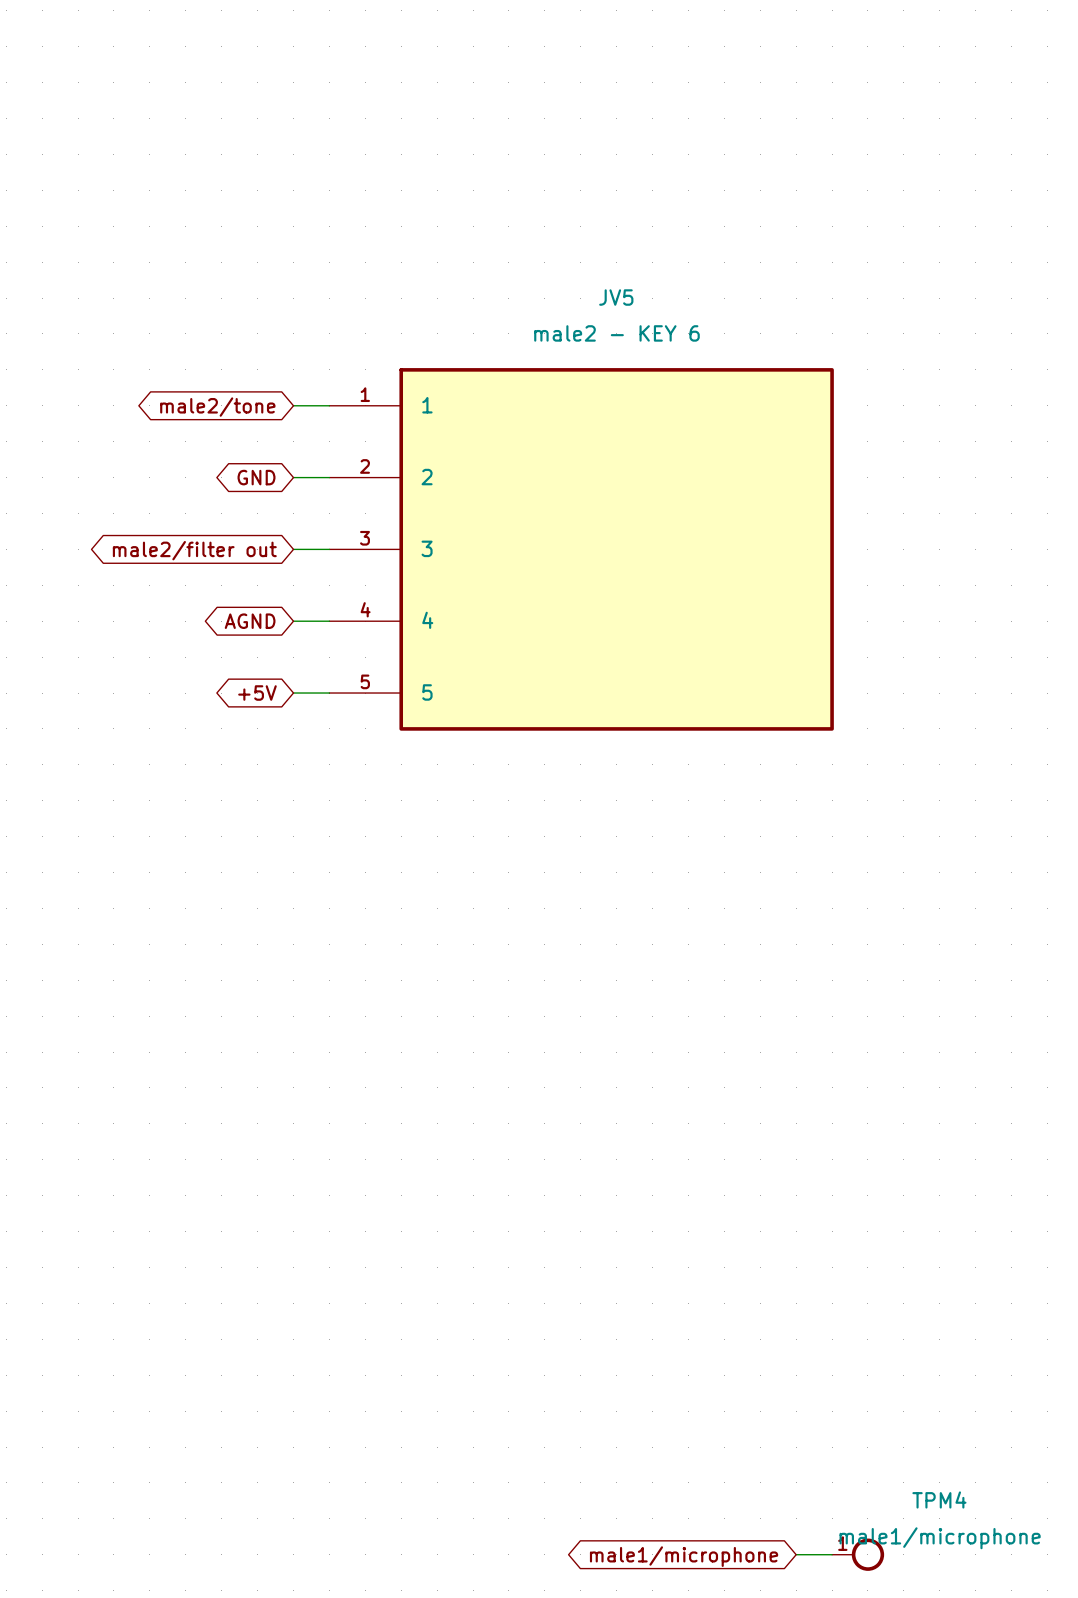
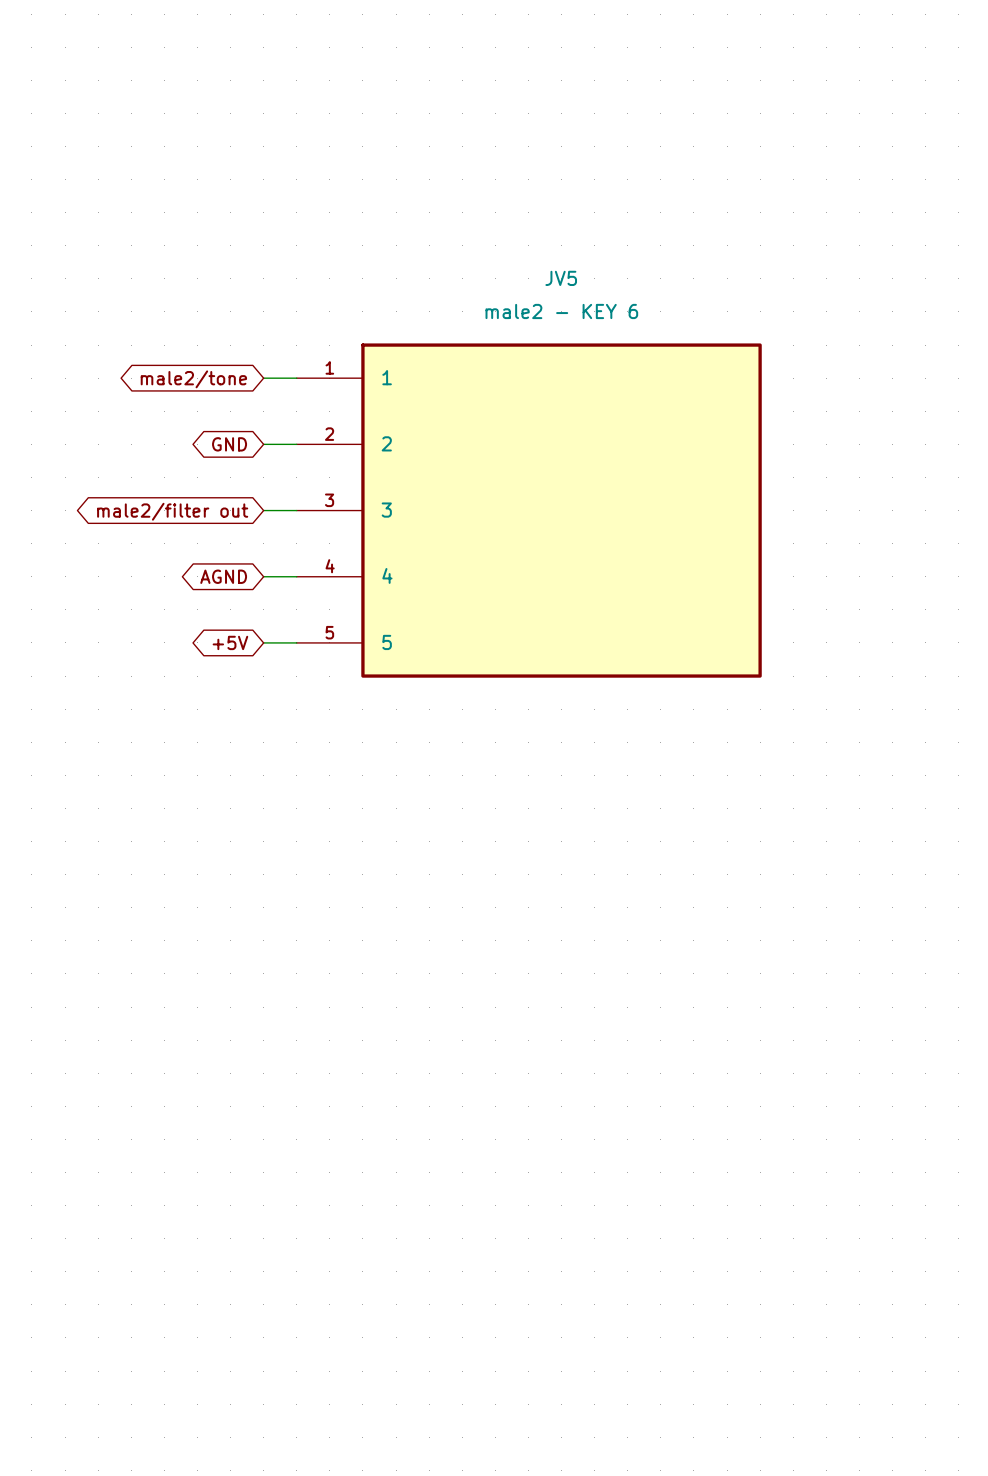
wire: (796, 1554) (832, 1554) -> none
TPM4: male1/microphone (858, 1554) -> none
global label: male1/microphone (684, 1556) -> none

